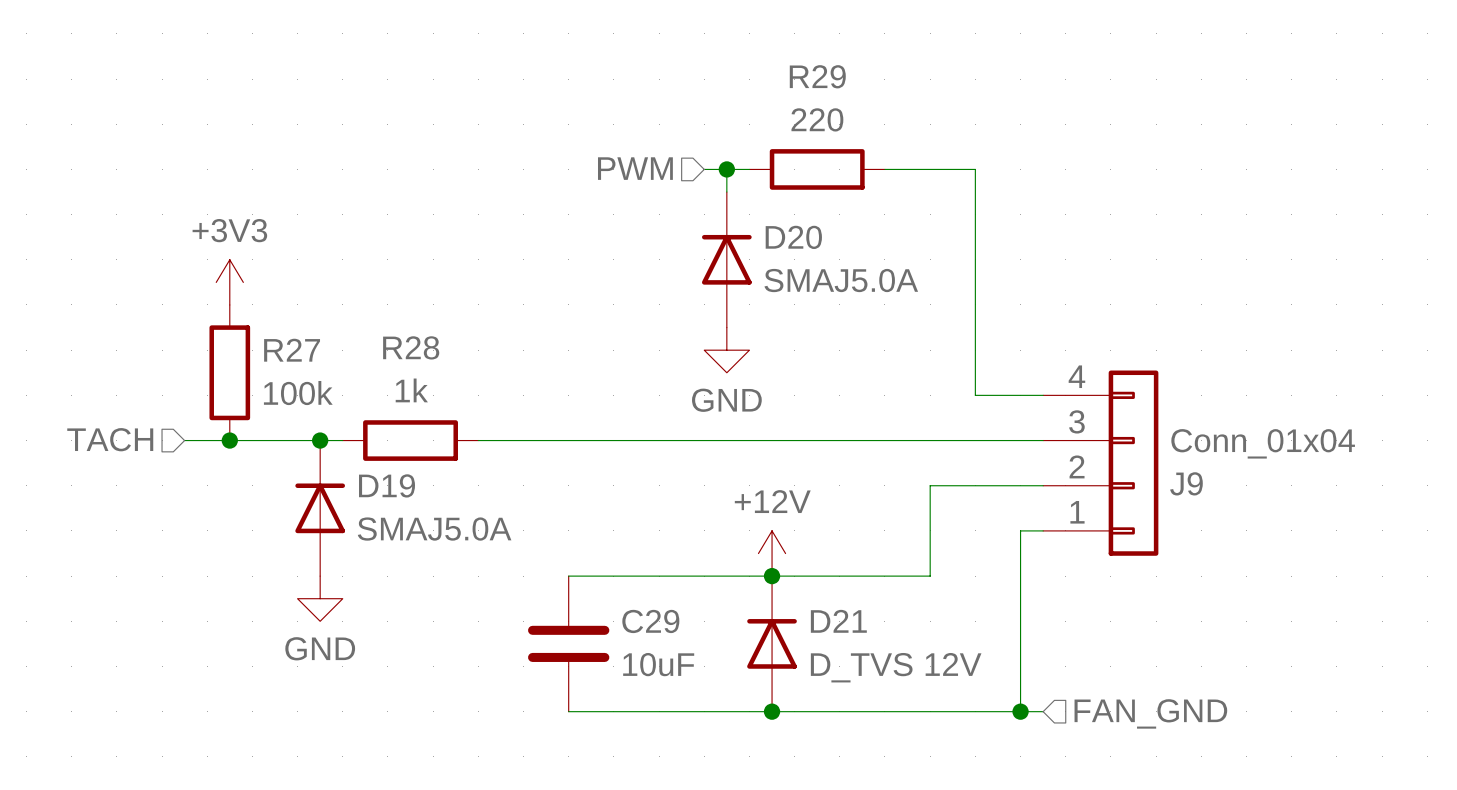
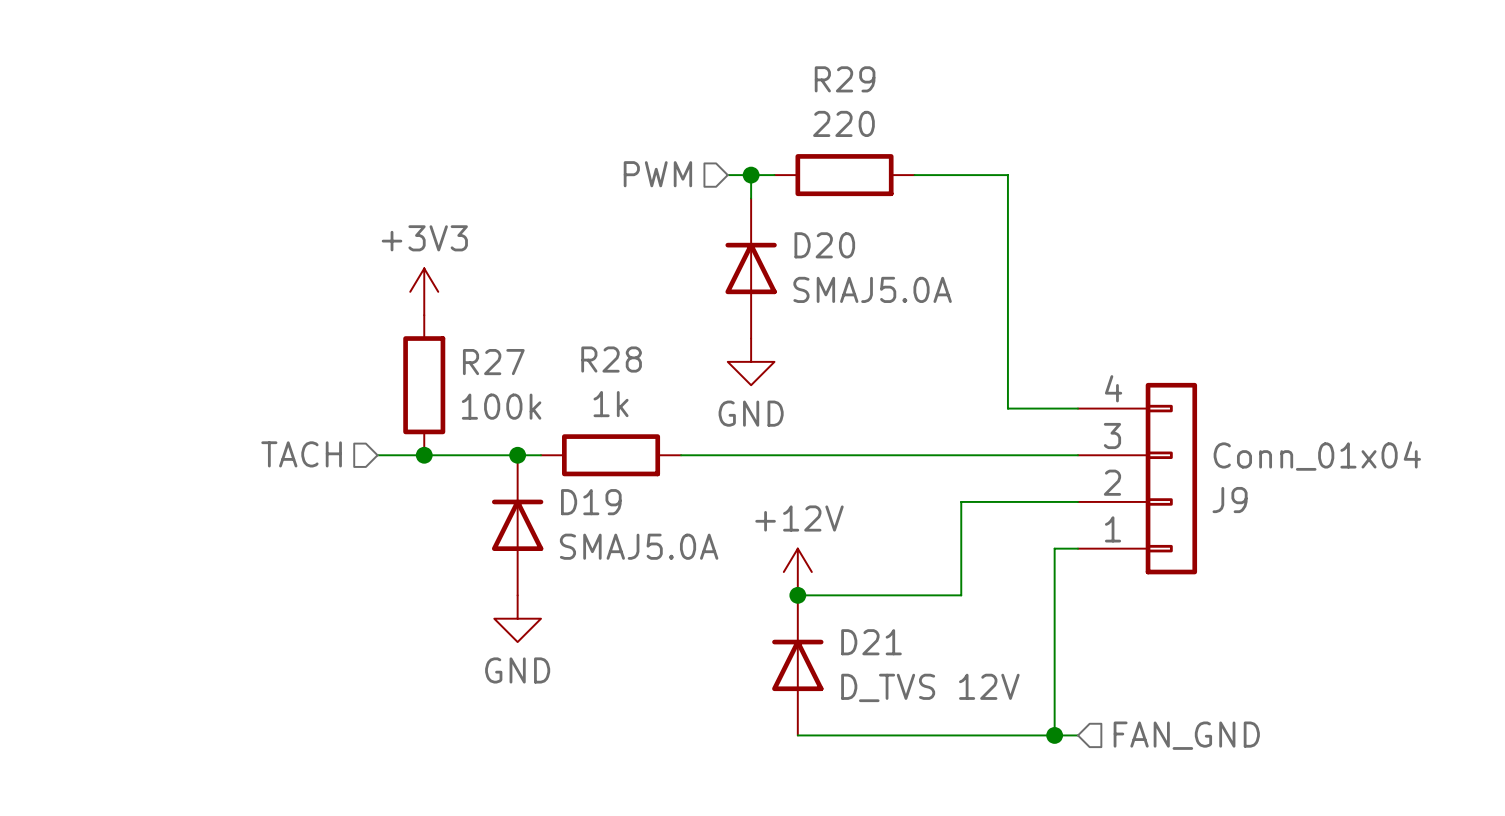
power symbol position: +3V3 (229, 282) -> +3V3 (424, 291)
R27 position: (229, 372) -> (424, 385)
hierarchical label position: TACH (110, 439) -> TACH (301, 454)
wire: (184, 440) (342, 440) -> none
junction: (229, 440) -> none
junction: (320, 440) -> none
wire: none -> (377, 455) (494, 455)
junction: none -> (424, 455)
R28 position: (410, 440) -> (611, 455)
junction: none -> (517, 455)
wire: (523, 440) (659, 440) -> none
D19 position: (320, 508) -> (517, 525)
wire: (568, 576) (772, 576) -> none
power symbol position: GND (320, 598) -> GND (517, 618)
C29: 10uF (568, 643) -> none
wire: (568, 711) (772, 711) -> none
junction: (772, 711) -> none

